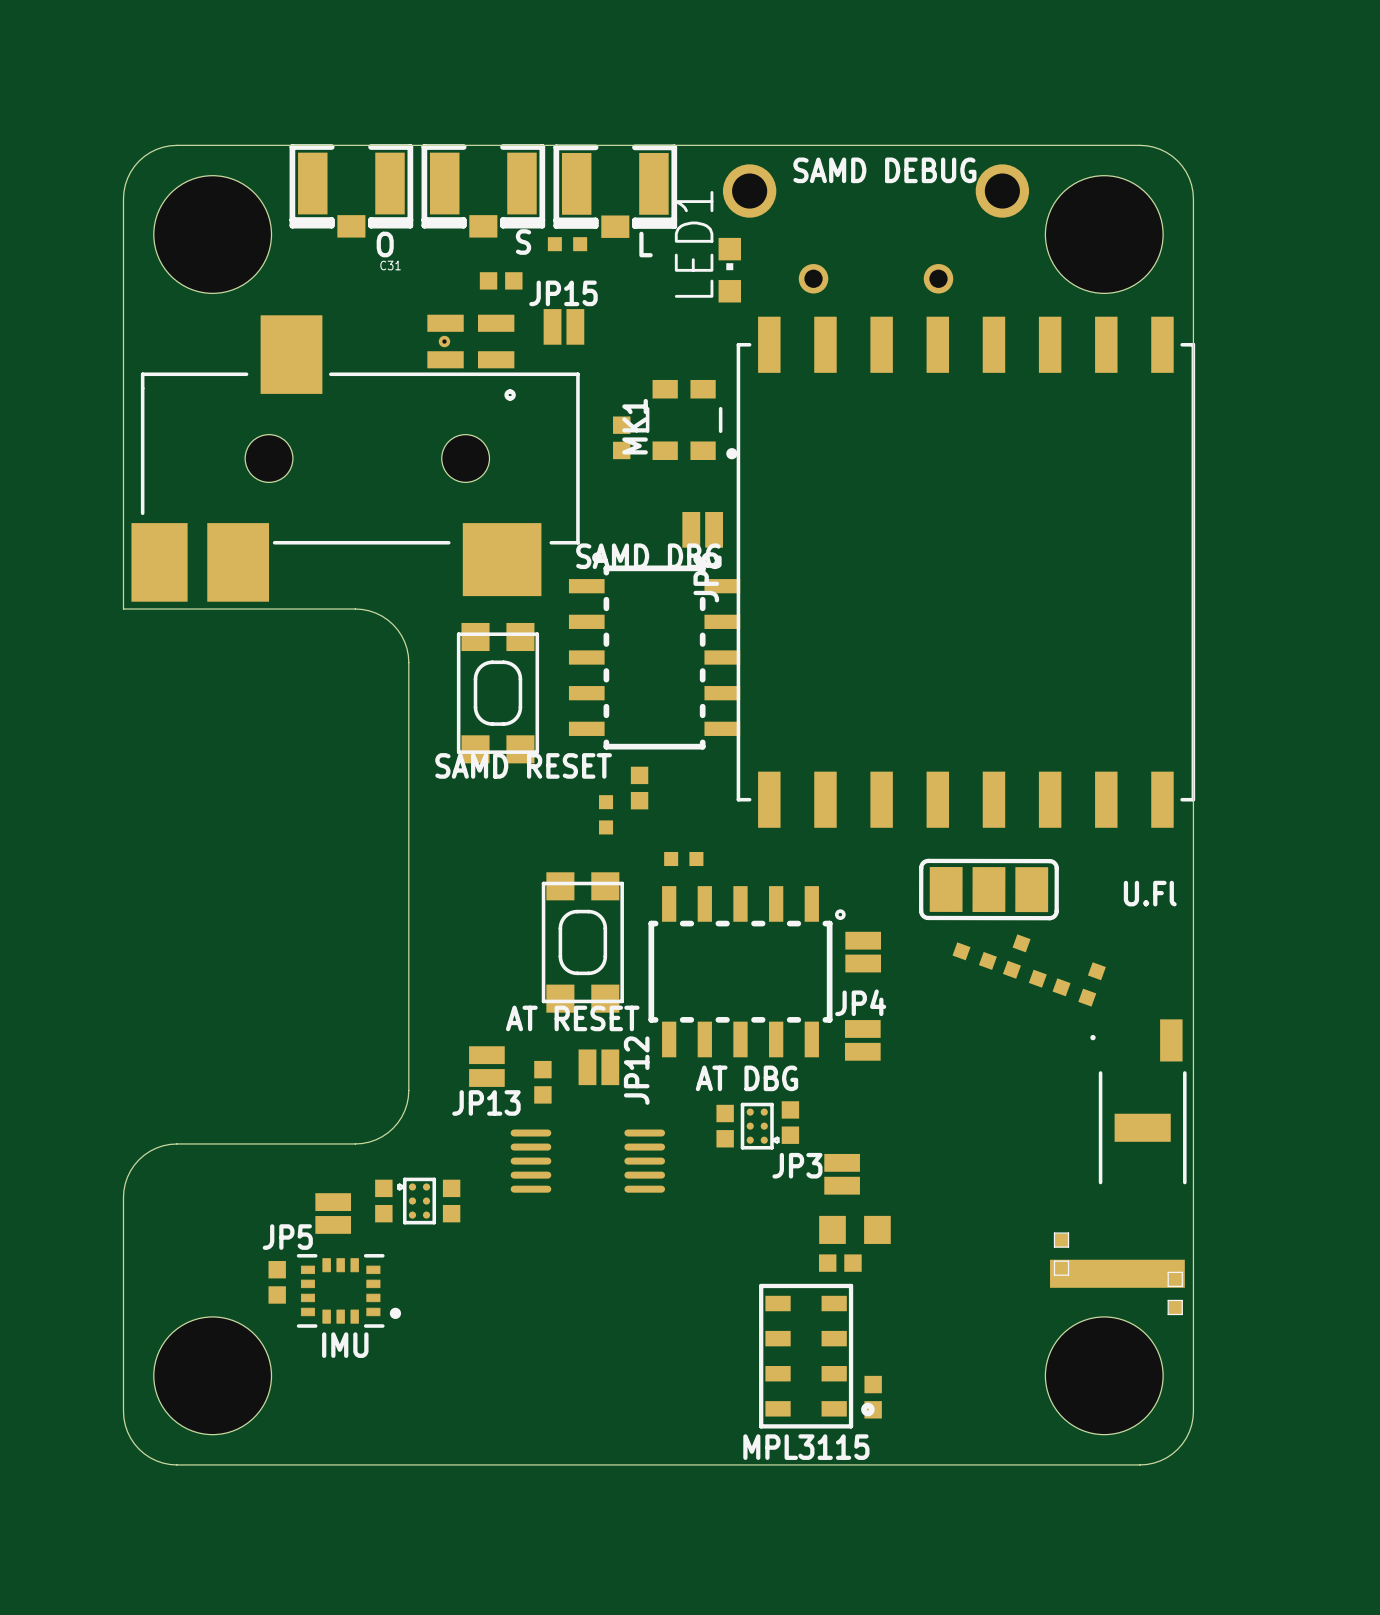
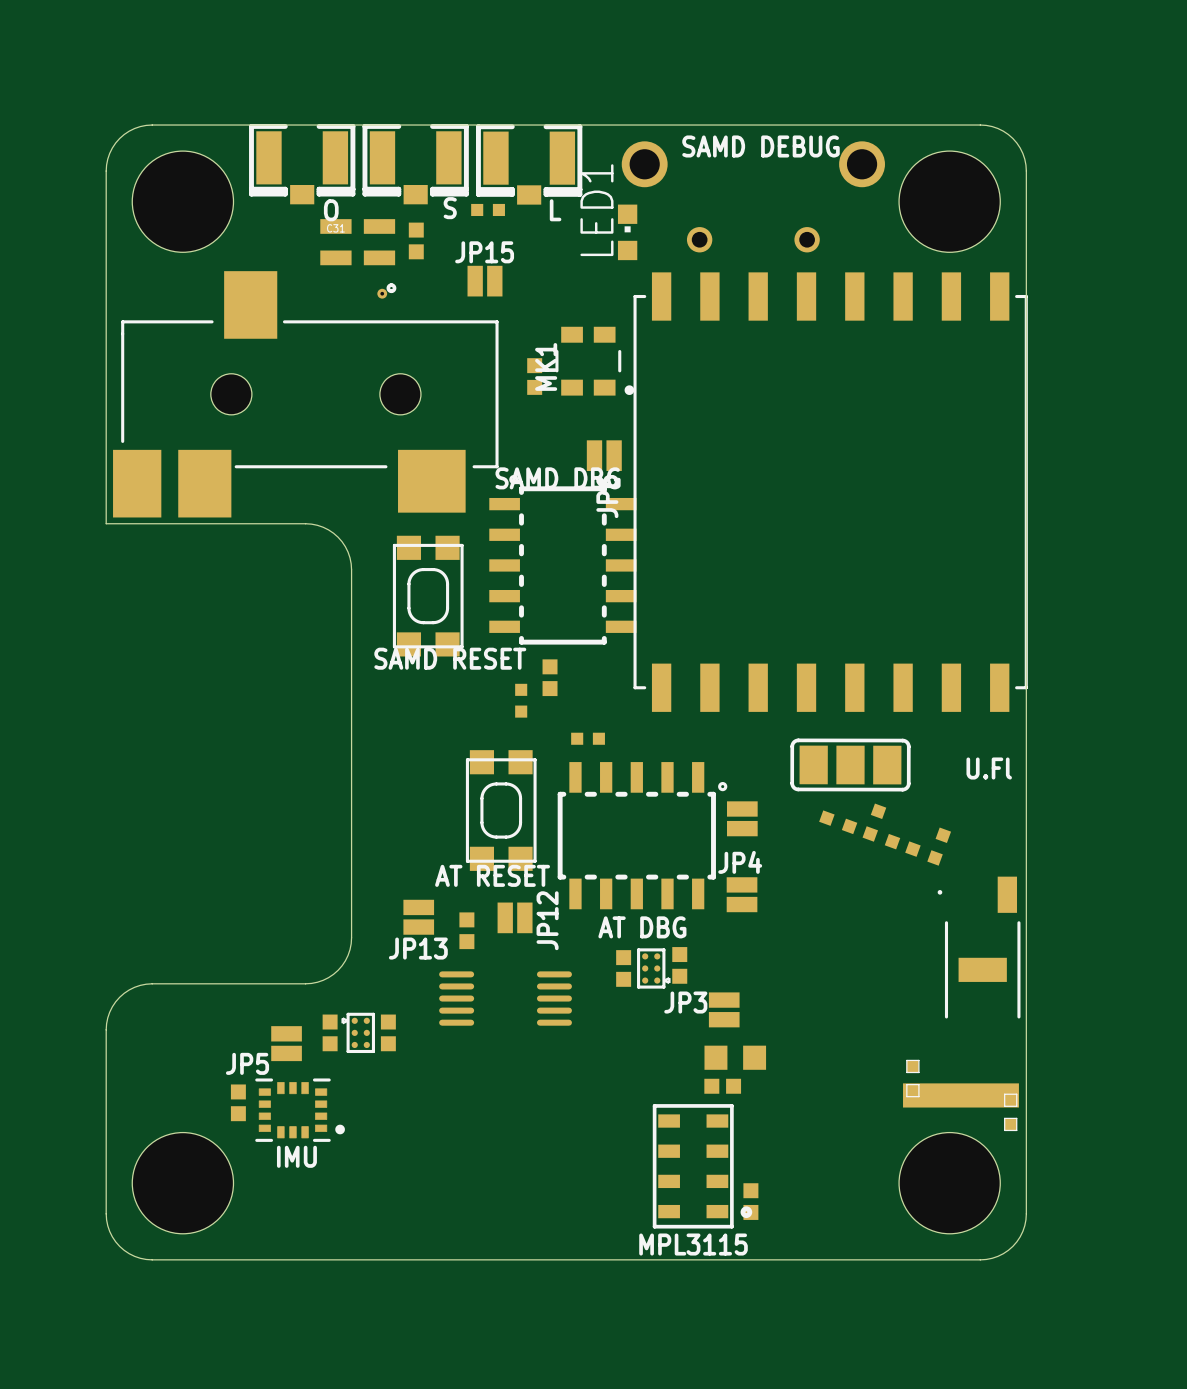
part rotation: 0° (501, 280) -> 90° clockwise (416, 240)
part position: (471, 357) -> (358, 256)

